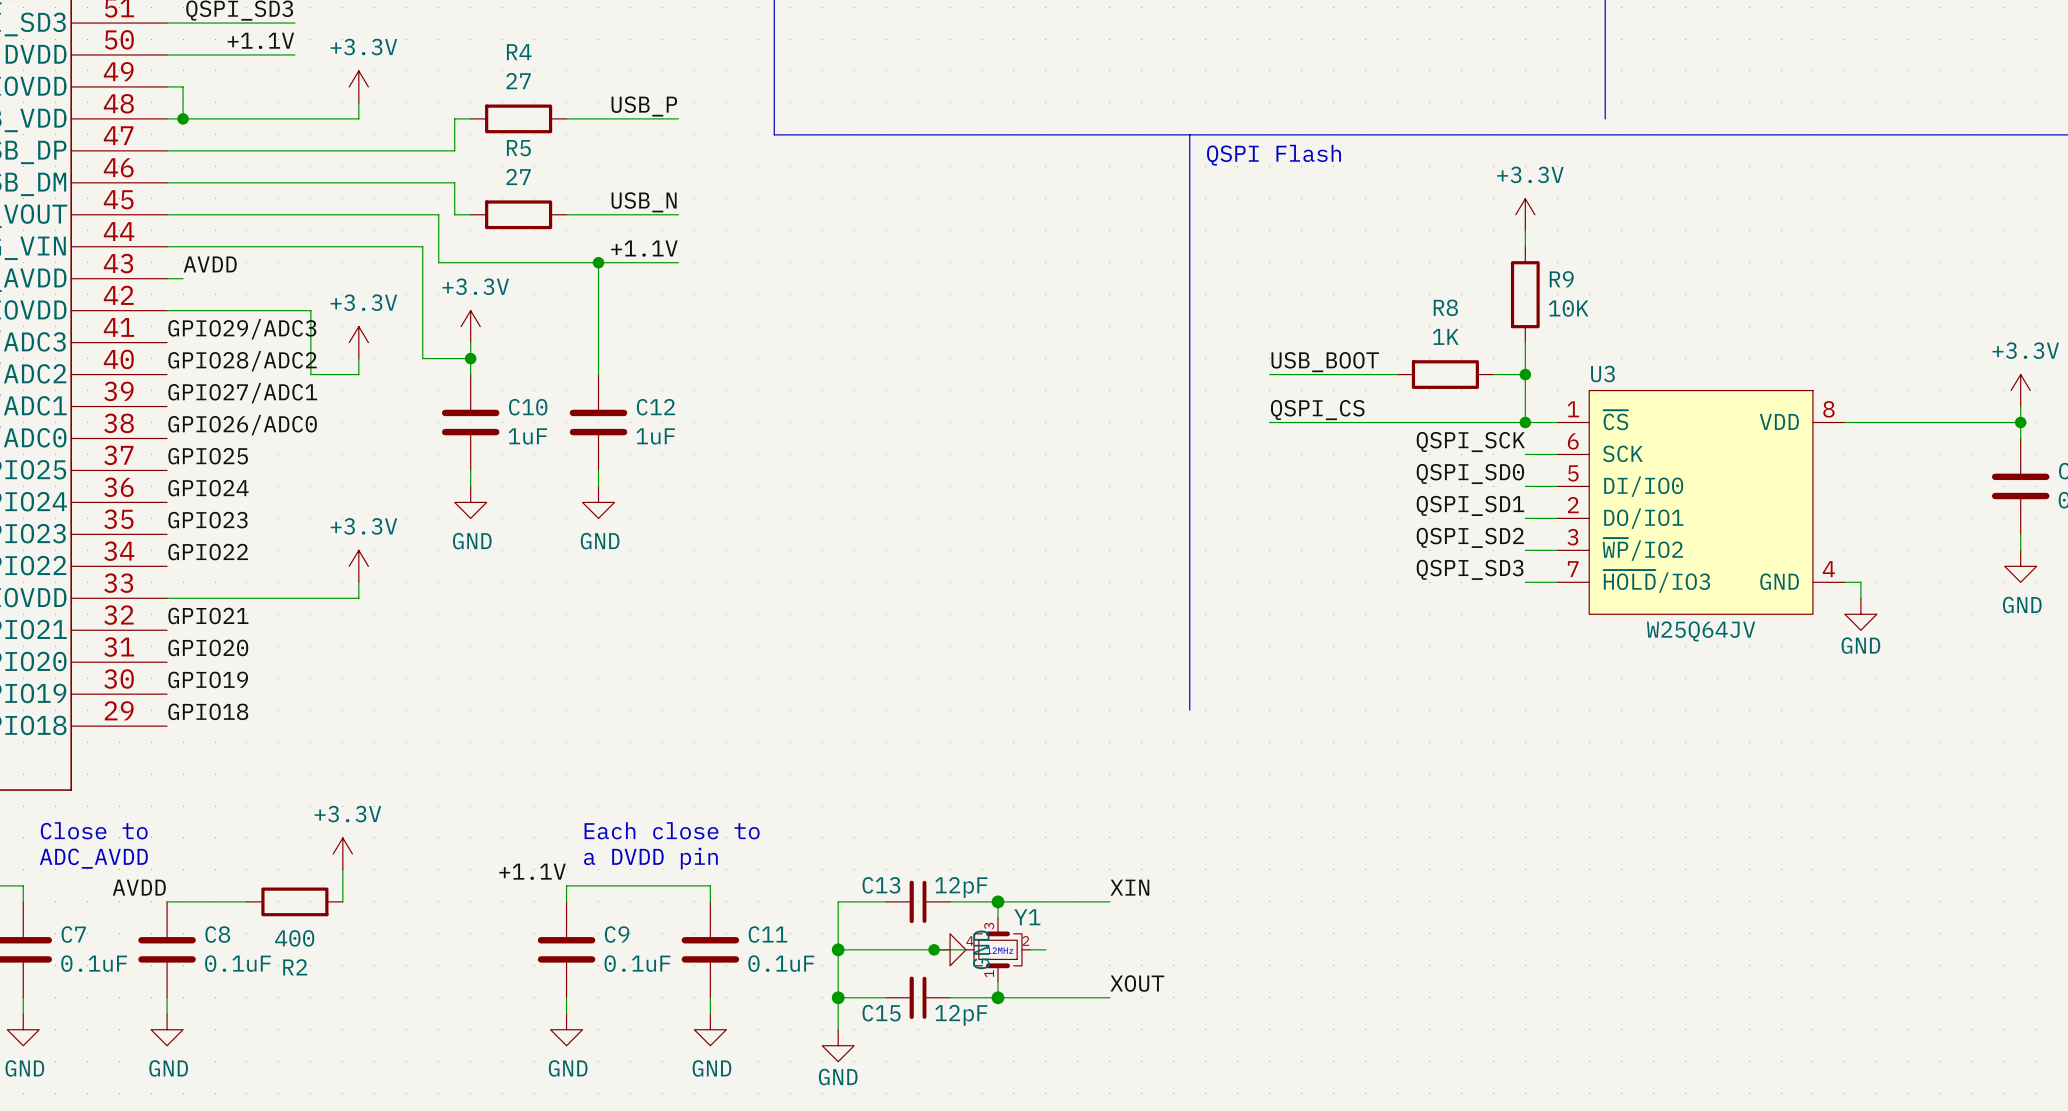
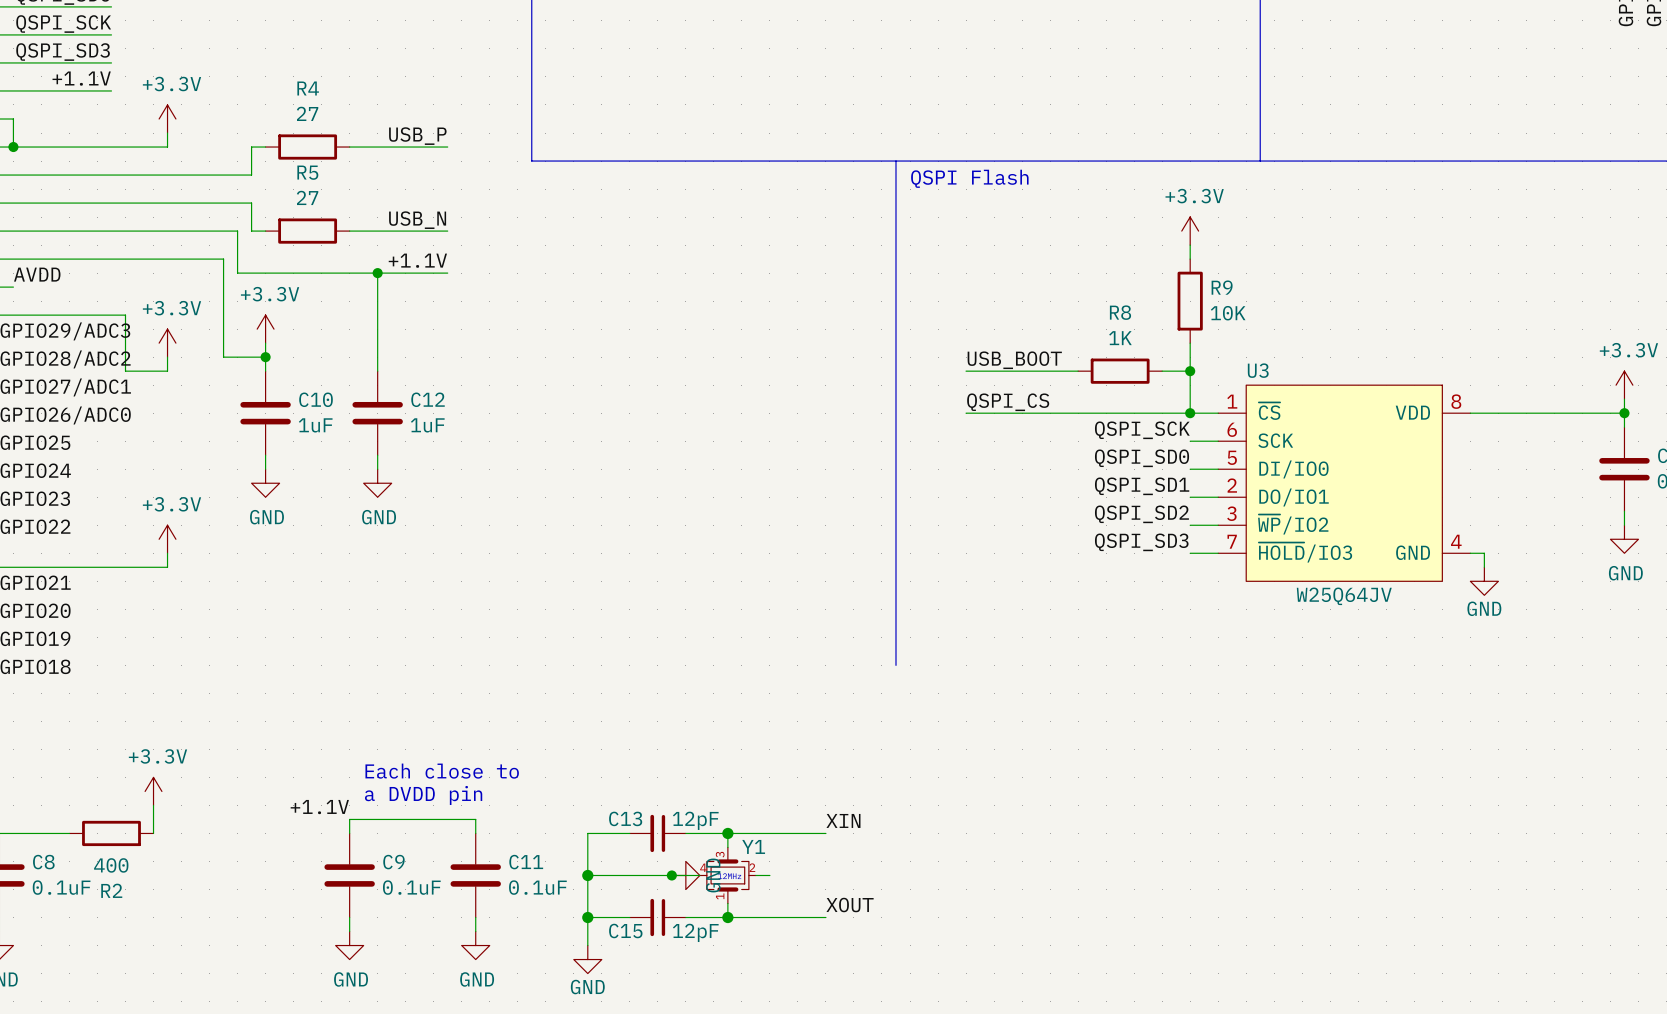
line: none -> (1260, 147) (1260, 161)

